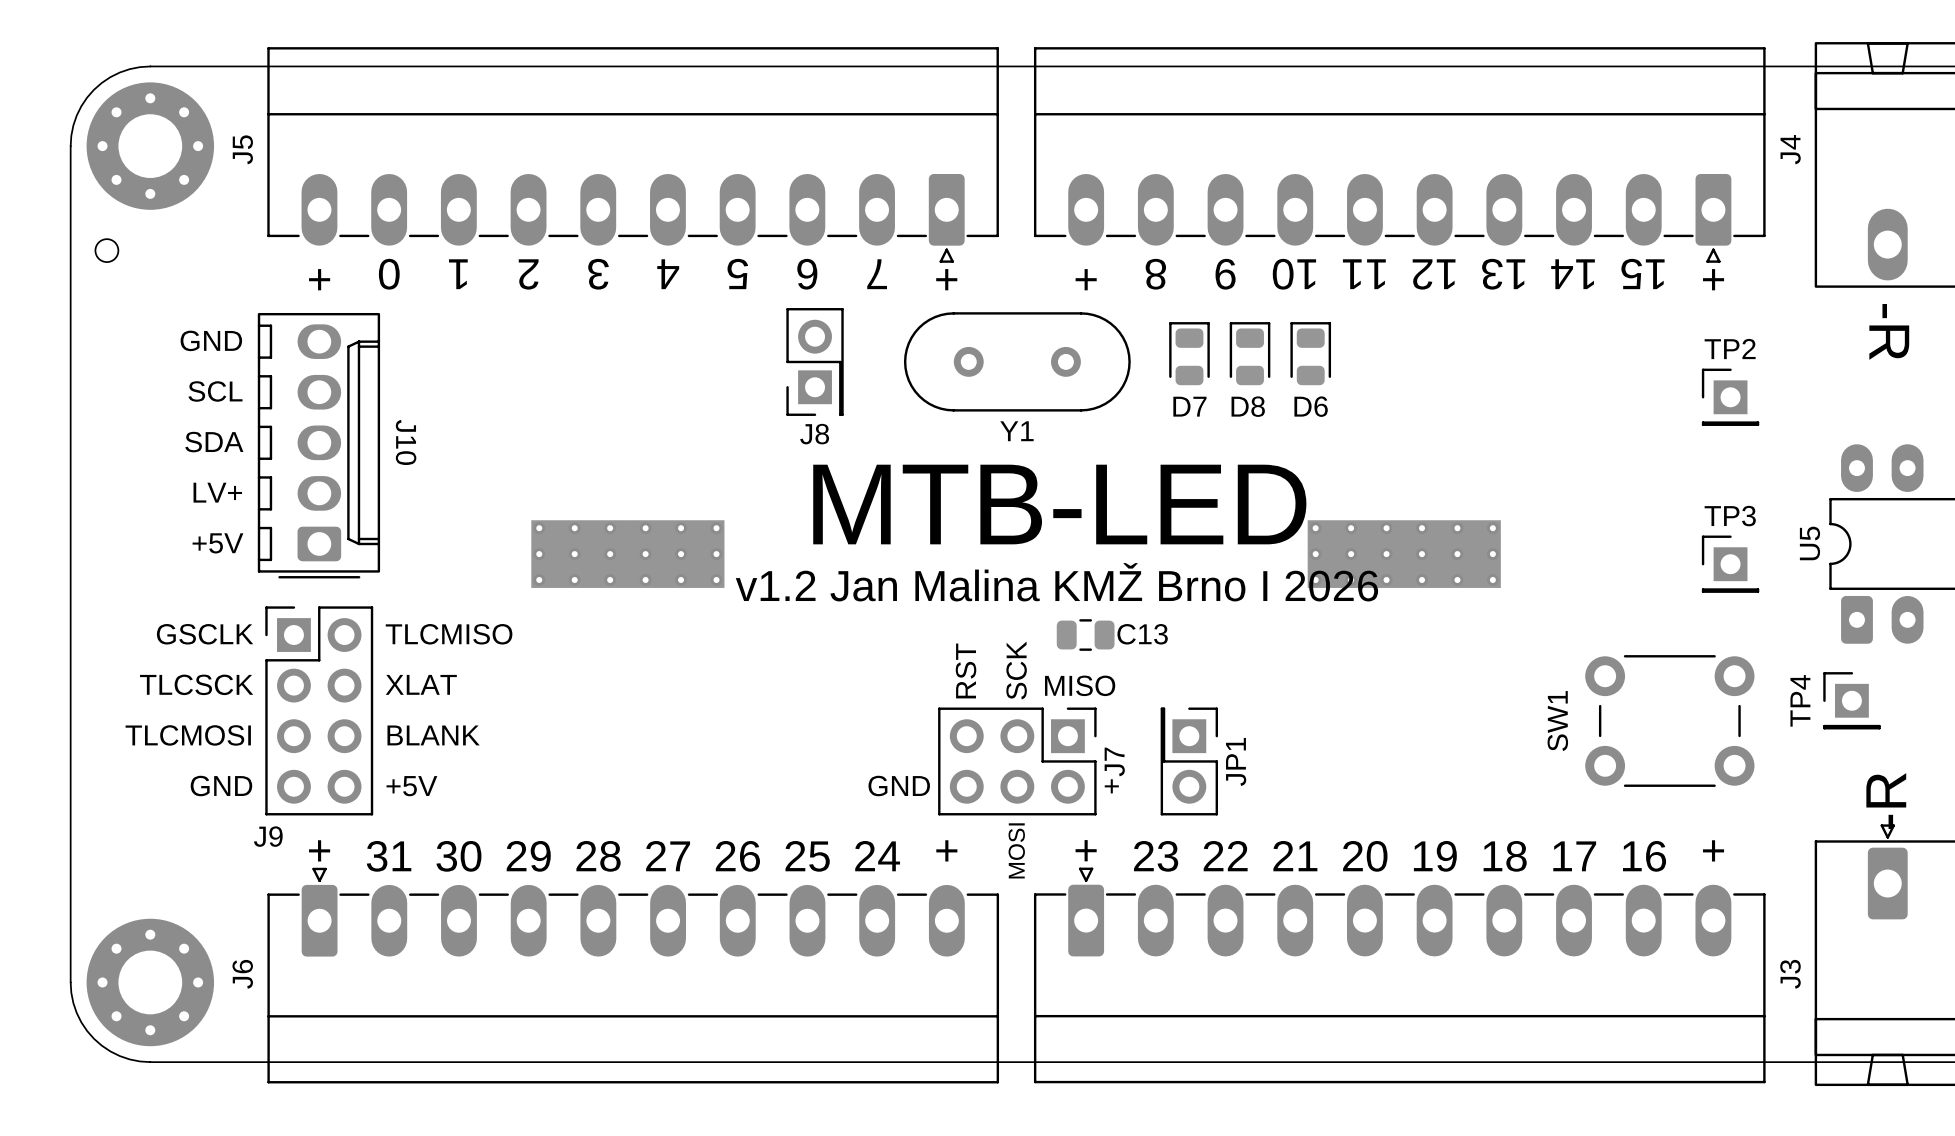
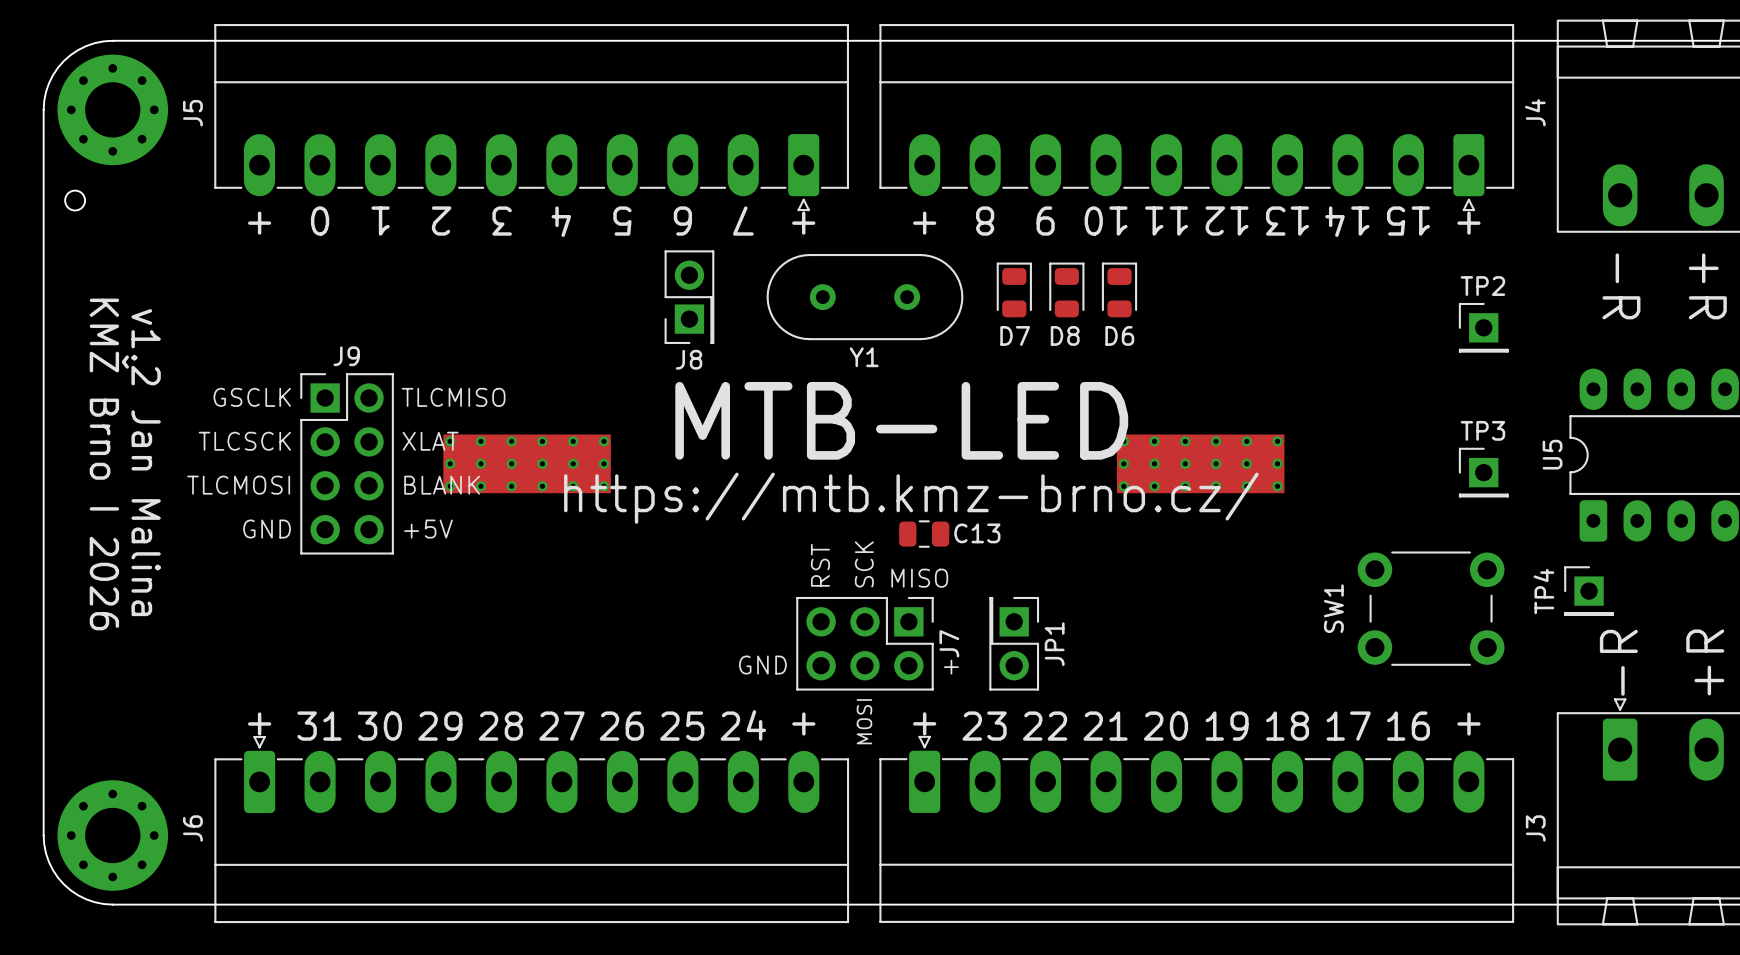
text: GND (211, 340) -> none
text: SCL (215, 391) -> none
text: SDA (214, 442) -> none
J10: (318, 445) -> none
text: LV+ (217, 492) -> none
text: +5V (217, 543) -> none
text: none -> KMŽ Brno I 2026 (109, 464)
text: none -> v1.2 Jan Malina (146, 462)
text: v1.2 Jan Malina KMŽ Brno I 2026 (1056, 582) -> https://mtb.kmz-brno.cz/ (911, 498)
text: none -> GND (267, 529)
text: none -> +5V (428, 529)
text position: GSCLK (205, 634) -> GSCLK (252, 397)
text position: TLCMISO (449, 634) -> TLCMISO (453, 397)
text position: TLCSCK (196, 684) -> TLCSCK (244, 441)
text position: XLAT (421, 684) -> XLAT (430, 441)
J9 position: (319, 710) -> (347, 463)
text position: TLCMOSI (188, 735) -> TLCMOSI (238, 485)
text position: BLANK (433, 735) -> BLANK (442, 485)
text: GND (221, 786) -> none
text: +5V (411, 786) -> none
J9 name position: J9 (268, 836) -> J9 (346, 356)

